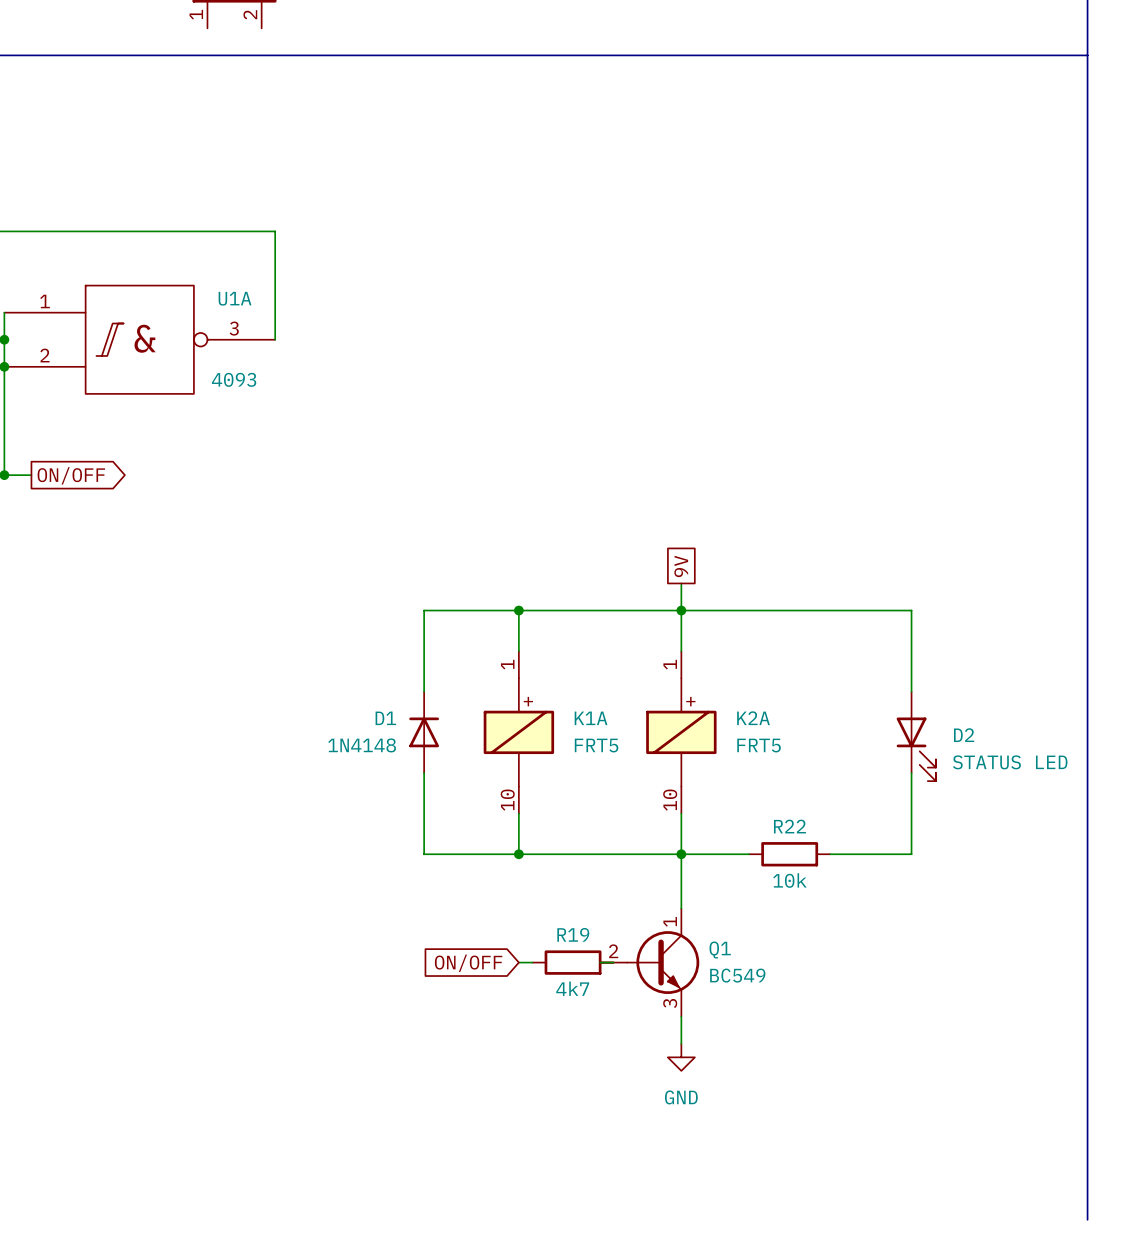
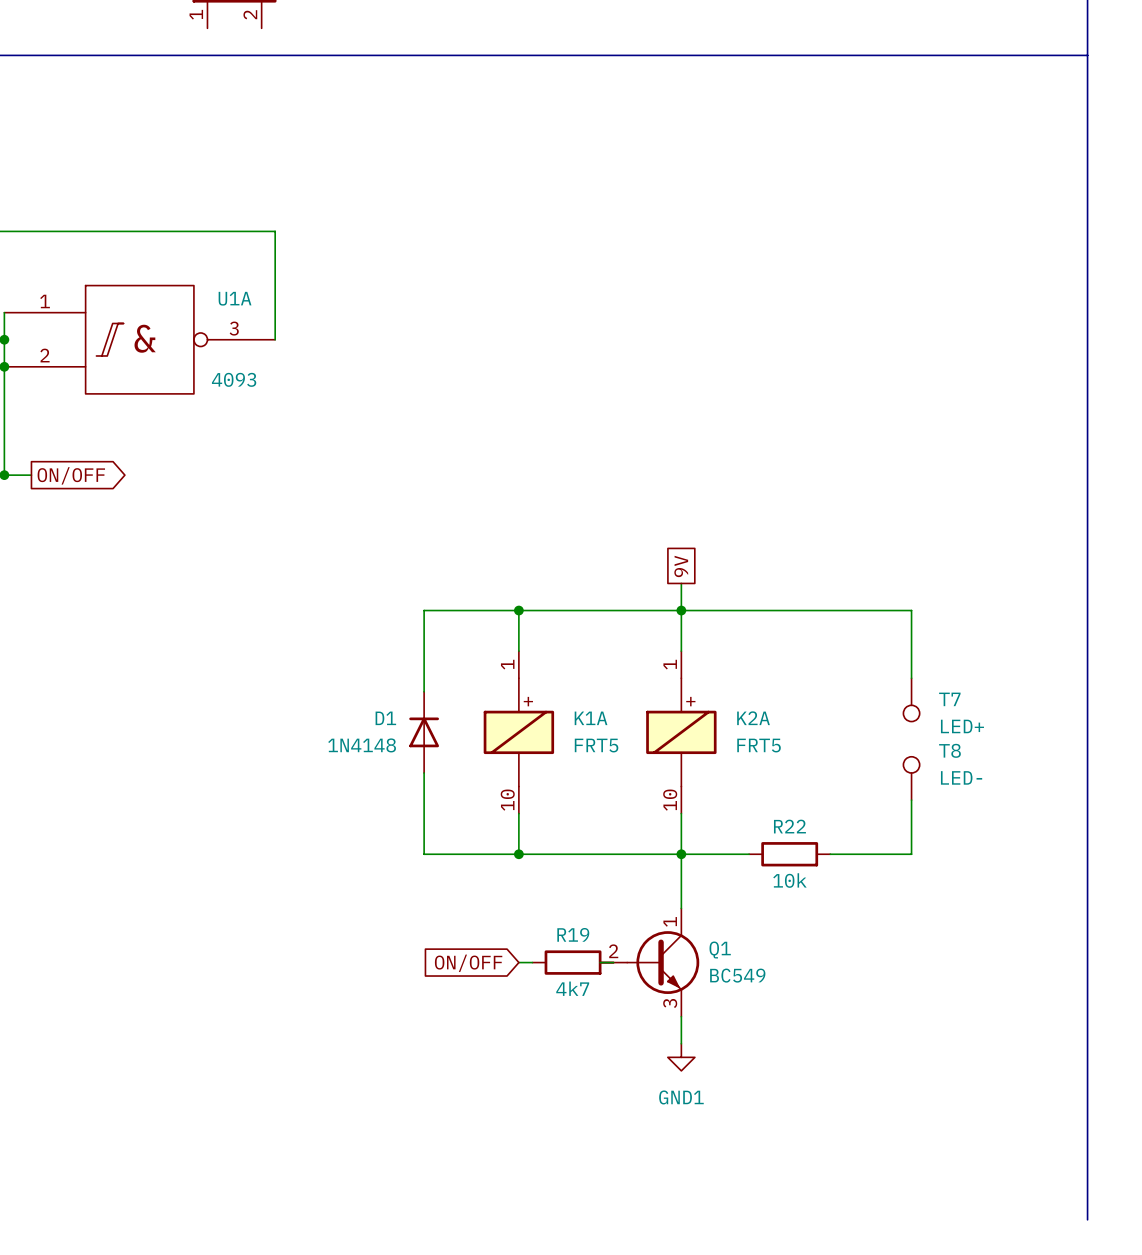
T7: none -> LED+ (911, 699)
D2: STATUS LED (916, 736) -> none
T8: none -> LED- (911, 778)
power symbol: GND (681, 1057) -> GND1 (681, 1057)

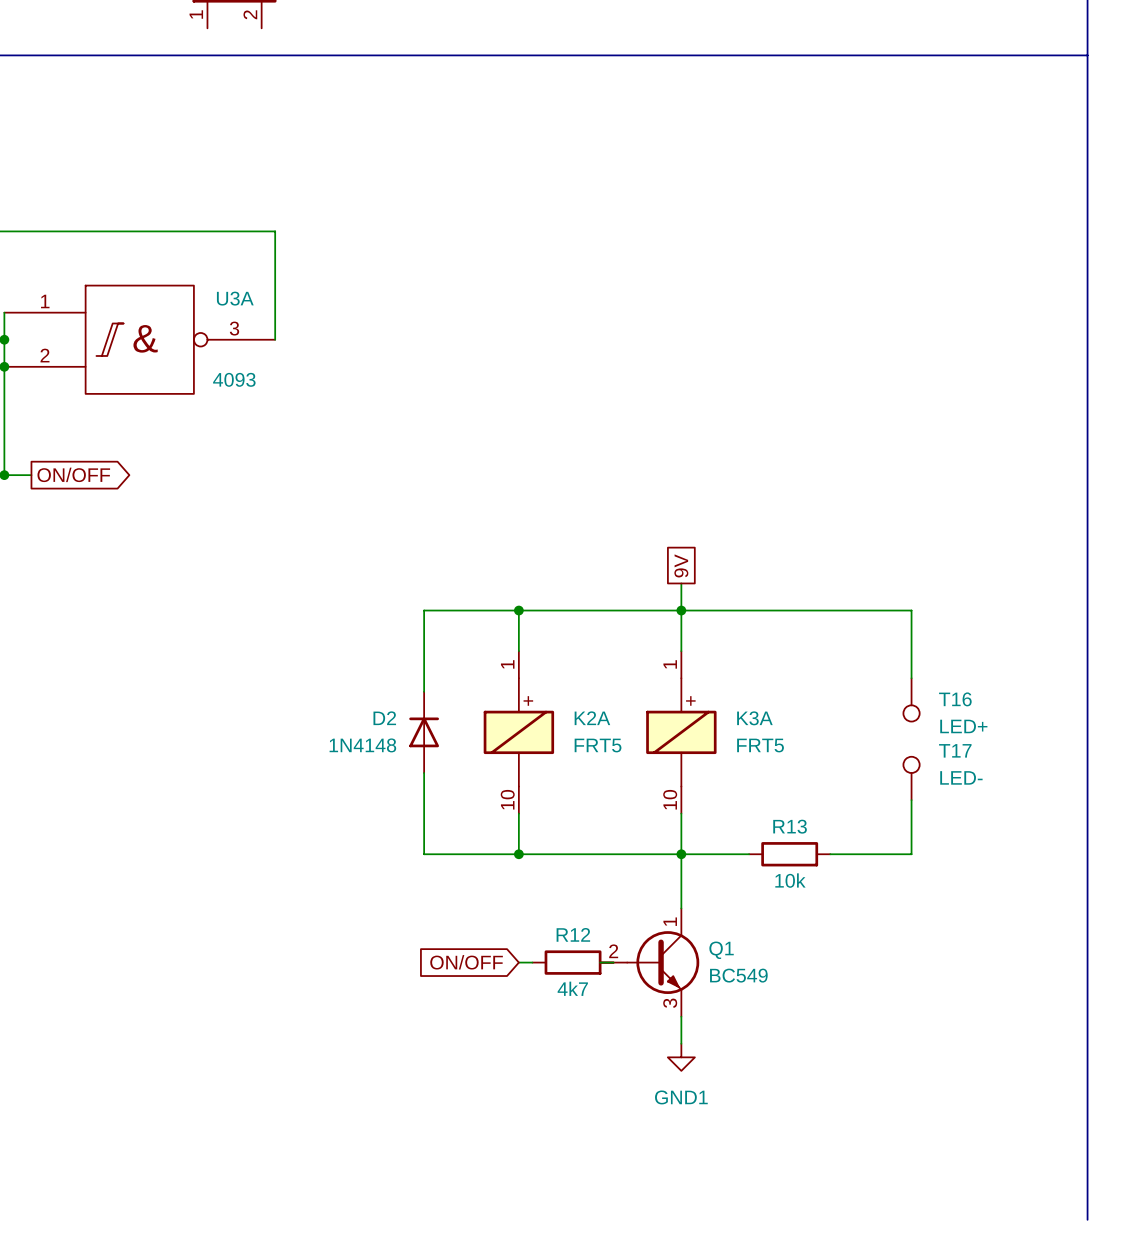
U1A name: U1A (235, 298) -> U3A (235, 298)
T7 name: T7 (949, 699) -> T16 (955, 699)
D1 name: D1 (385, 718) -> D2 (384, 718)
K1A name: K1A (591, 718) -> K2A (592, 718)
K2A name: K2A (753, 718) -> K3A (754, 718)
T8 name: T8 (949, 750) -> T17 (955, 750)
R22 name: R22 (789, 826) -> R13 (790, 826)
R19 name: R19 (573, 934) -> R12 (573, 934)

